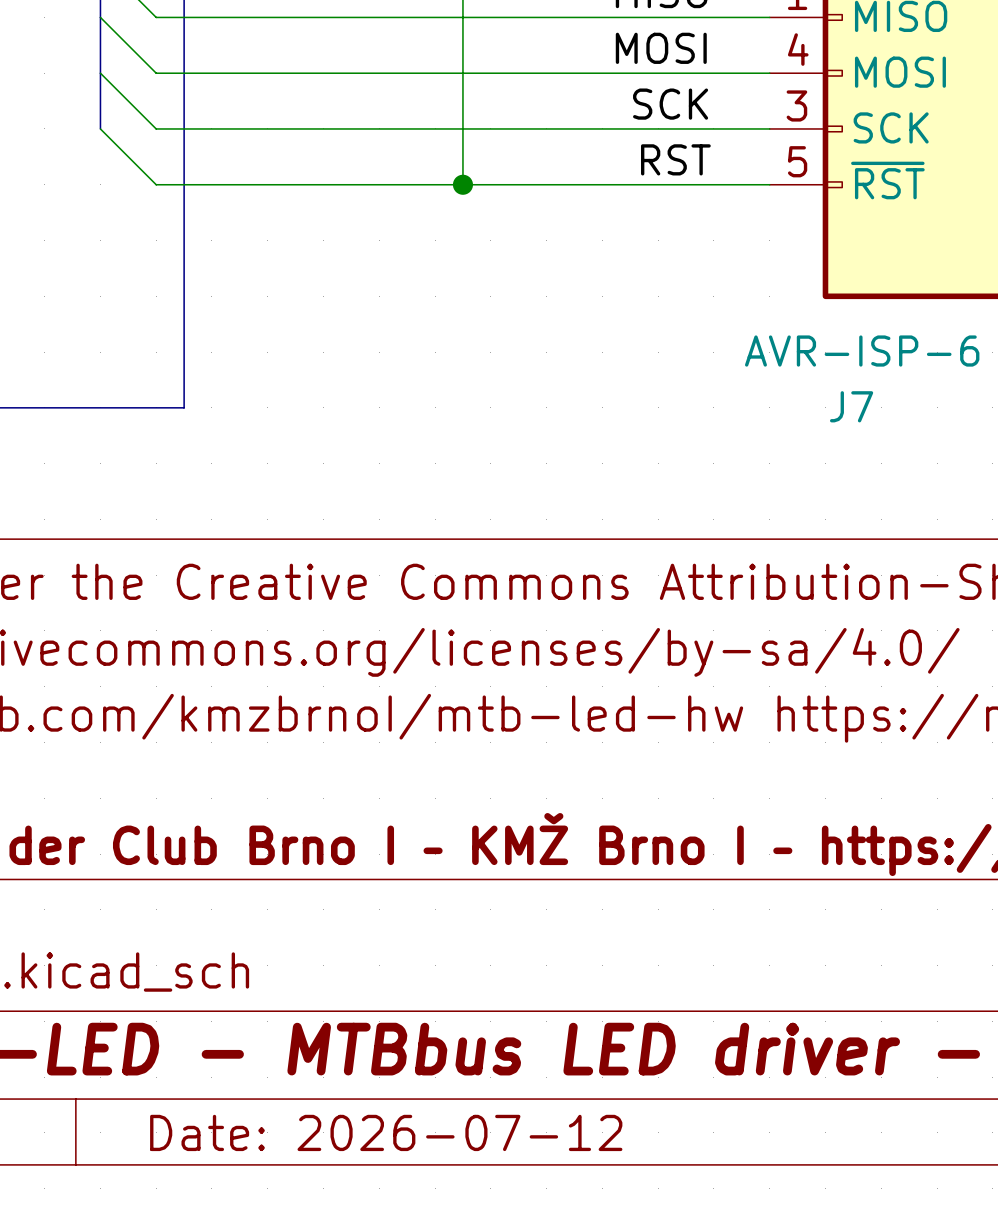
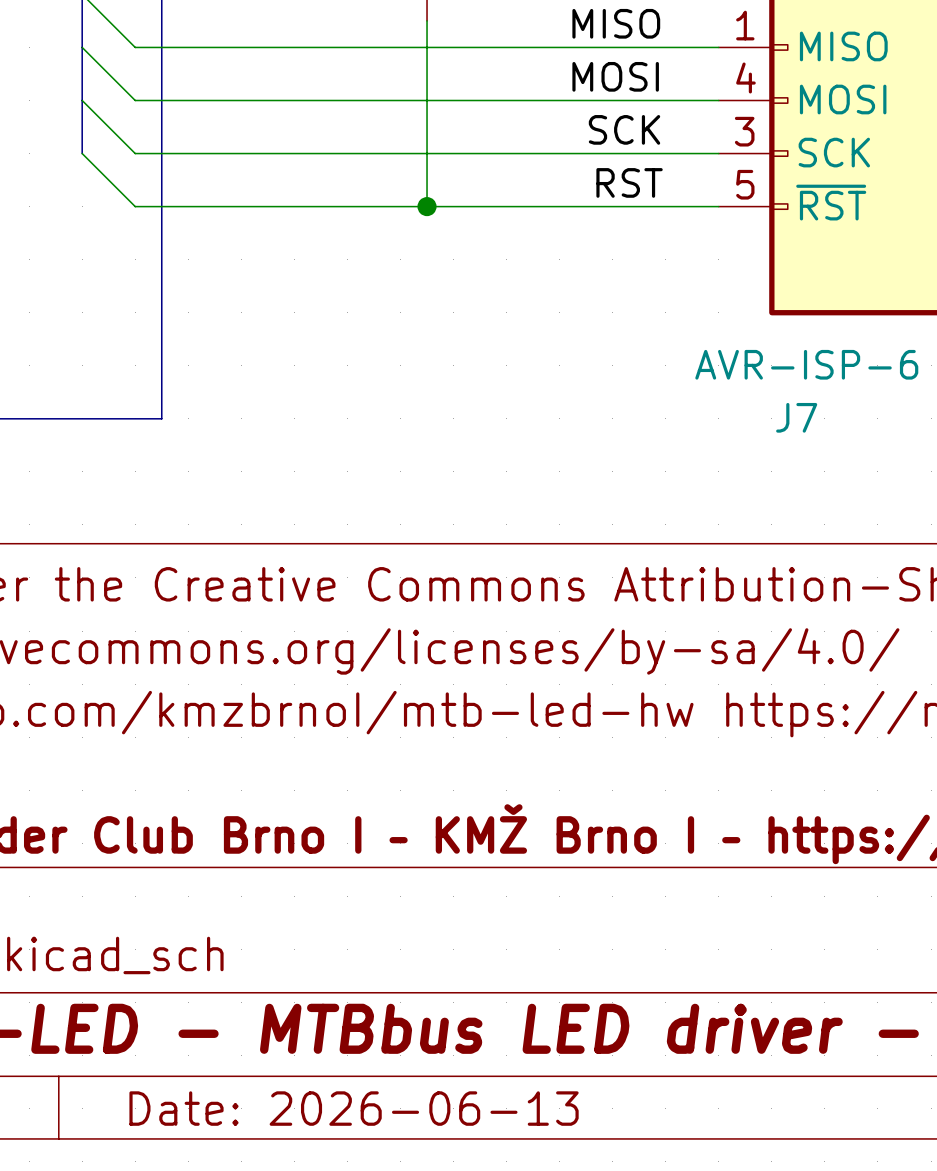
title block: Date: 2026-07-12 (386, 1132) -> Date: 2026-06-13 (354, 1108)

